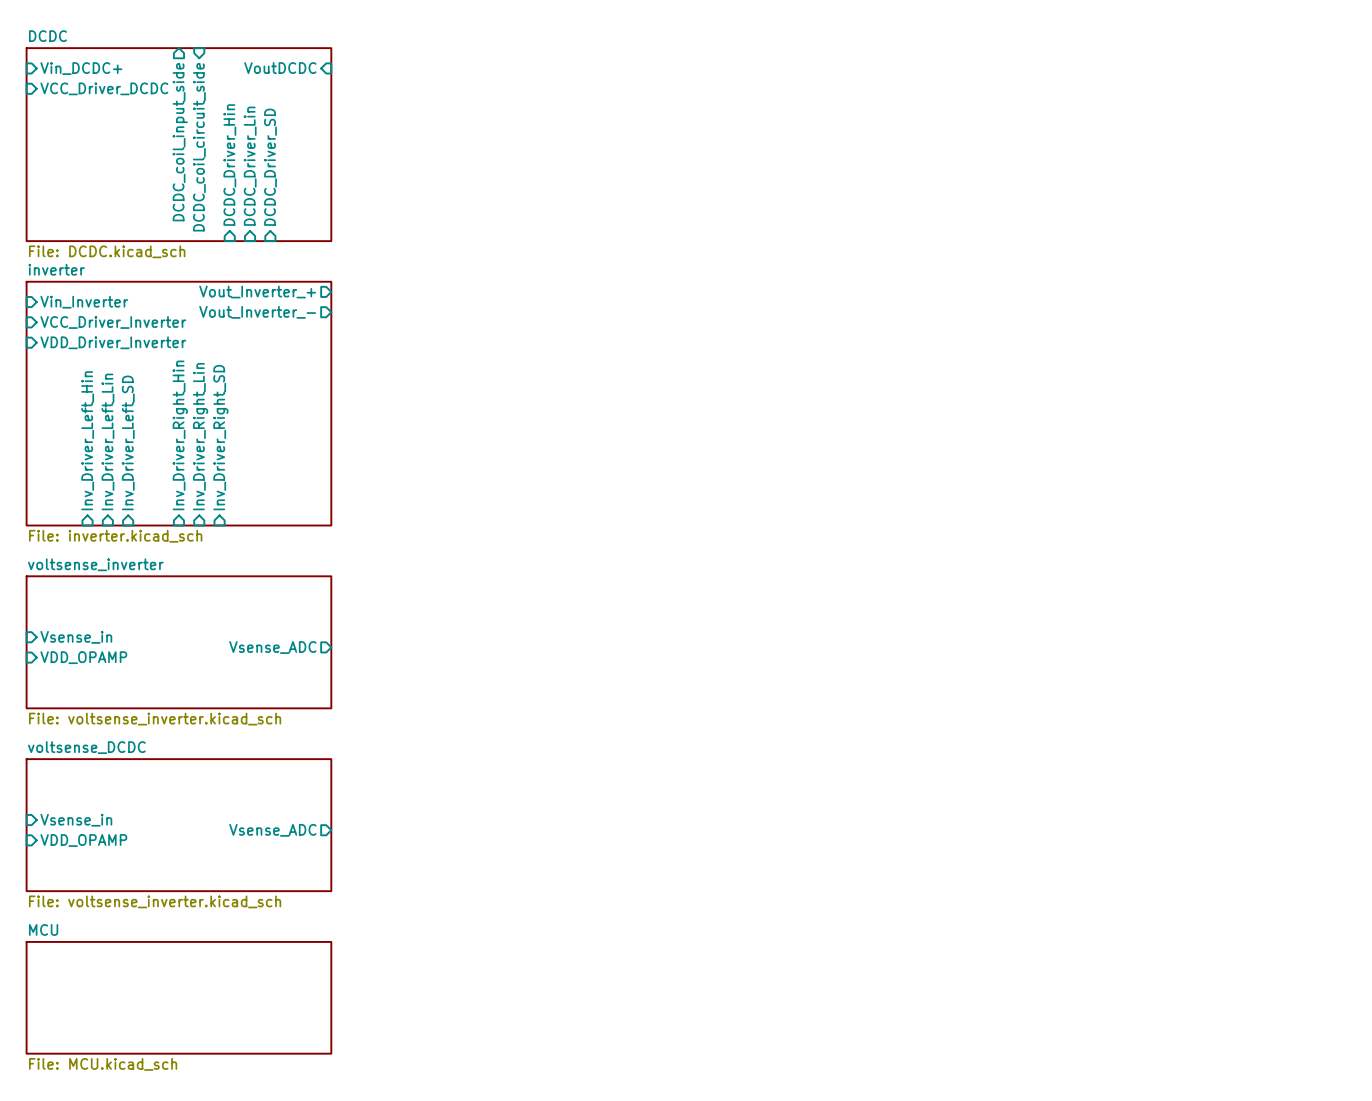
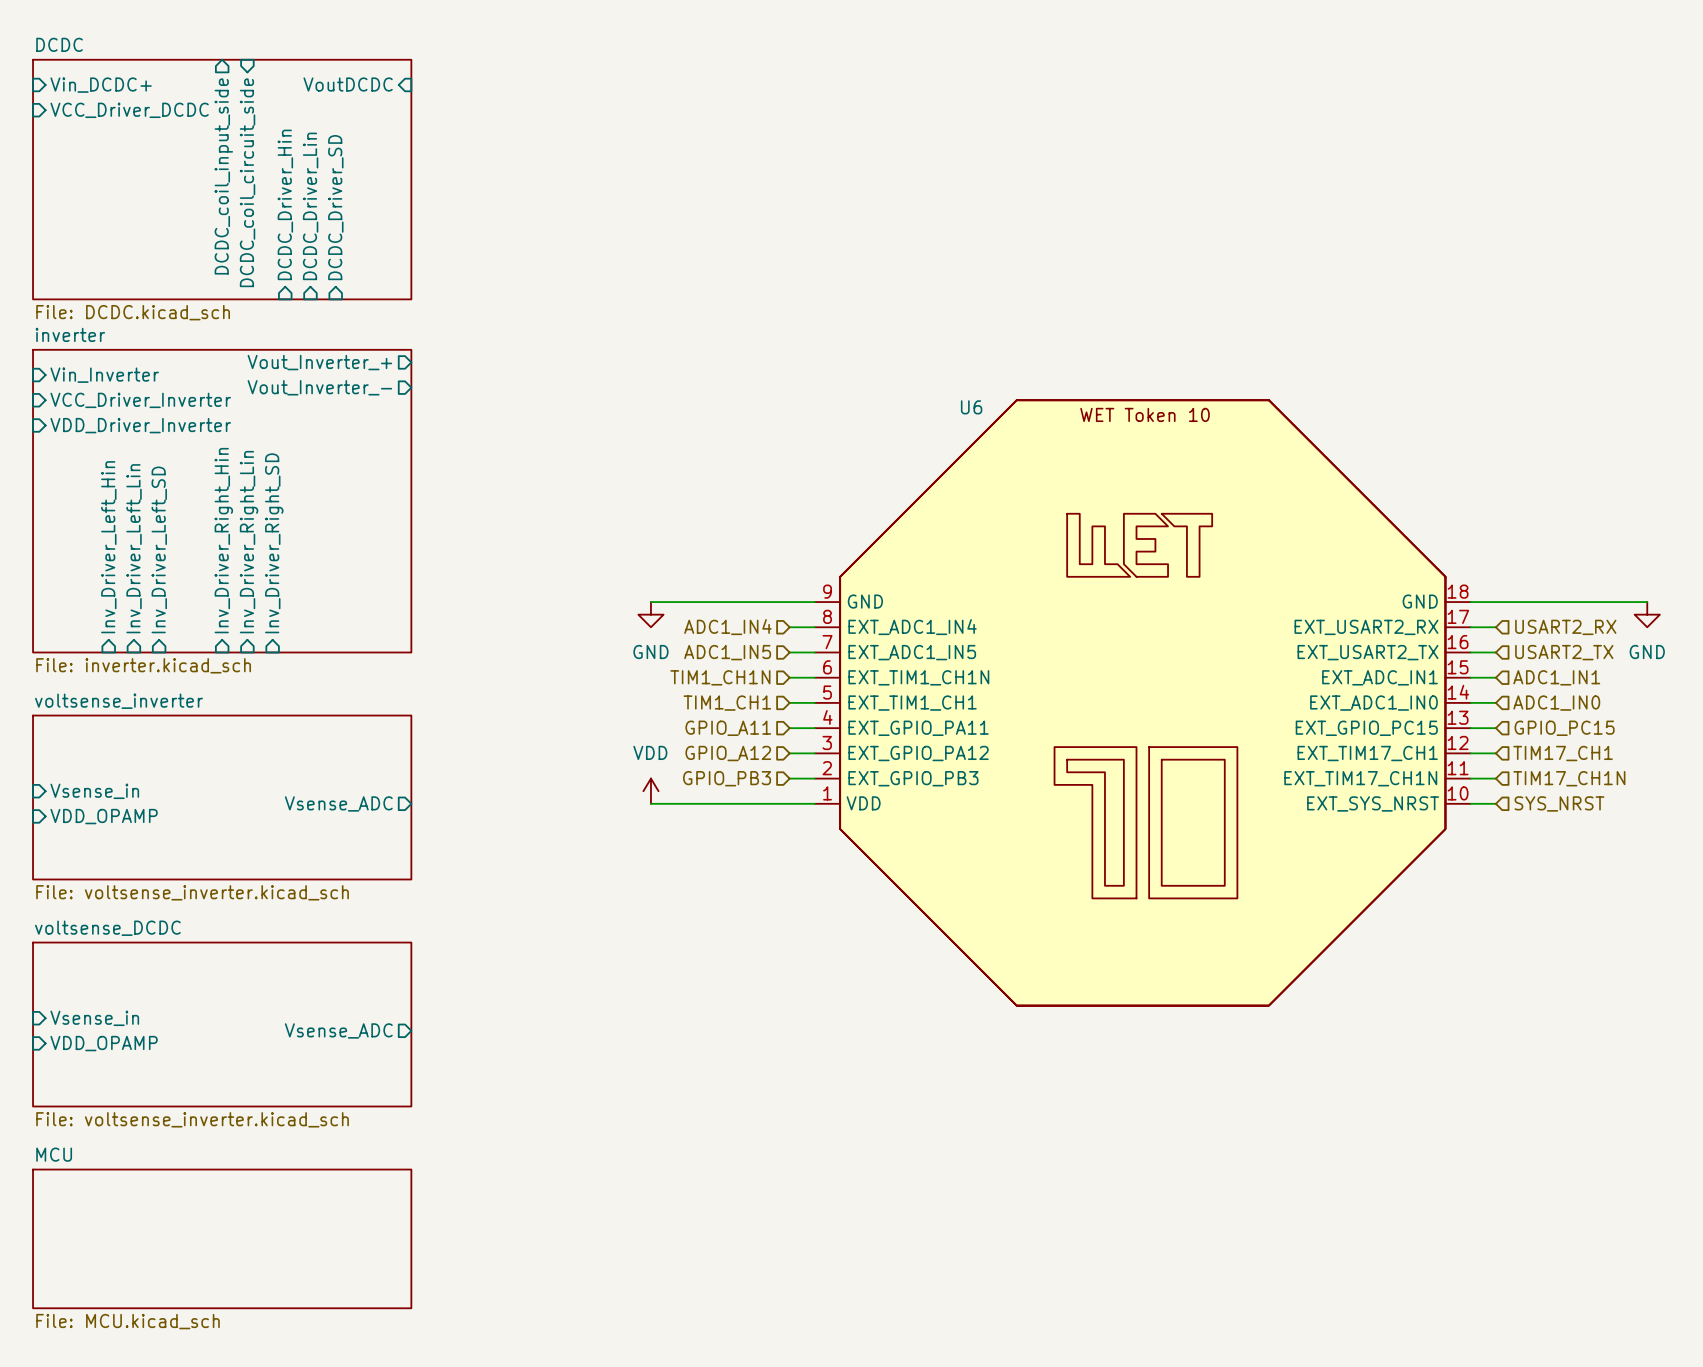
wire: none -> (650, 602) (814, 602)
wire: none -> (1470, 602) (1647, 602)
power symbol: none -> GND (650, 614)
power symbol: none -> GND (1647, 614)
hierarchical label: none -> ADC1_IN4 (727, 627)
wire: none -> (789, 627) (814, 627)
wire: none -> (1470, 627) (1495, 627)
hierarchical label: none -> USART2_RX (1565, 627)
hierarchical label: none -> ADC1_IN5 (727, 652)
wire: none -> (789, 652) (814, 652)
wire: none -> (1470, 652) (1495, 652)
hierarchical label: none -> USART2_TX (1564, 652)
hierarchical label: none -> TIM1_CH1N (720, 677)
wire: none -> (789, 677) (814, 677)
wire: none -> (1470, 677) (1495, 677)
hierarchical label: none -> ADC1_IN1 (1556, 677)
hierarchical label: none -> TIM1_CH1 (727, 703)
wire: none -> (789, 702) (814, 702)
U6: none -> (1142, 702)
wire: none -> (1470, 702) (1495, 702)
hierarchical label: none -> ADC1_IN0 (1556, 703)
hierarchical label: none -> GPIO_A11 (728, 728)
wire: none -> (789, 728) (814, 728)
wire: none -> (1470, 728) (1495, 728)
hierarchical label: none -> GPIO_PC15 (1564, 728)
hierarchical label: none -> GPIO_A12 (728, 753)
wire: none -> (789, 753) (814, 753)
wire: none -> (1470, 753) (1495, 753)
hierarchical label: none -> TIM17_CH1 (1563, 753)
hierarchical label: none -> GPIO_PB3 (727, 778)
wire: none -> (789, 778) (814, 778)
wire: none -> (1470, 778) (1495, 778)
hierarchical label: none -> TIM17_CH1N (1569, 778)
power symbol: none -> VDD (650, 791)
wire: none -> (650, 803) (814, 803)
wire: none -> (1470, 803) (1495, 803)
hierarchical label: none -> SYS_NRST (1559, 803)

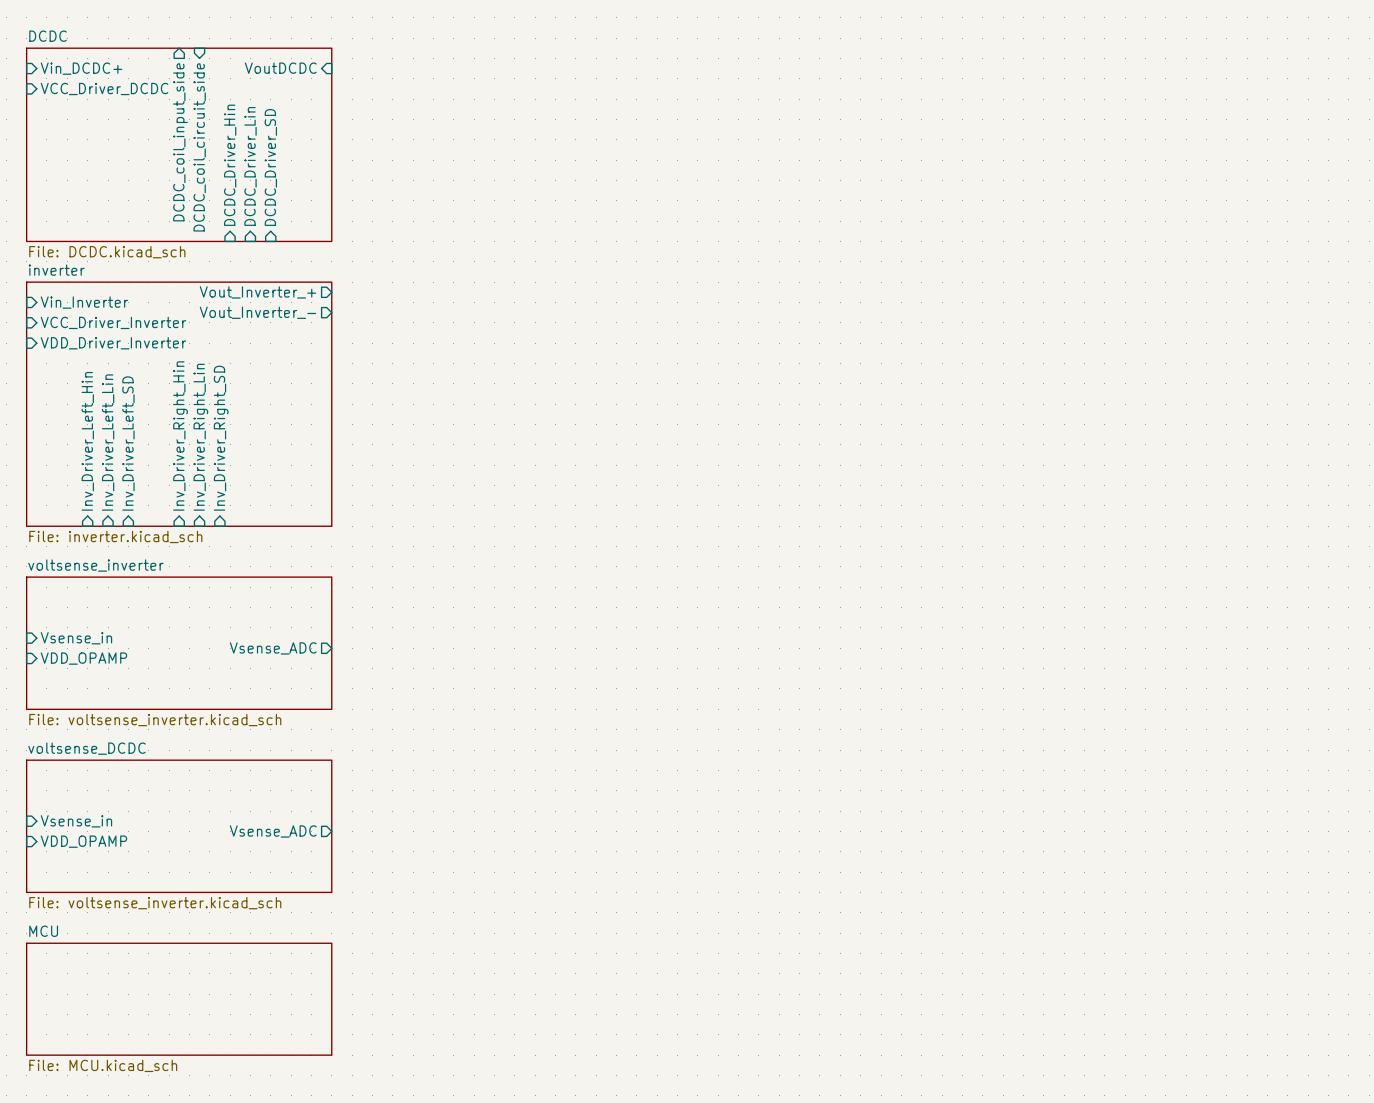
wire: (650, 602) (814, 602) -> none
wire: (1470, 602) (1647, 602) -> none
power symbol: GND (650, 614) -> none
power symbol: GND (1647, 614) -> none
hierarchical label: ADC1_IN4 (727, 627) -> none
wire: (789, 627) (814, 627) -> none
wire: (1470, 627) (1495, 627) -> none
hierarchical label: USART2_RX (1565, 627) -> none
hierarchical label: ADC1_IN5 (727, 652) -> none
wire: (789, 652) (814, 652) -> none
wire: (1470, 652) (1495, 652) -> none
hierarchical label: USART2_TX (1564, 652) -> none
hierarchical label: TIM1_CH1N (720, 677) -> none
wire: (789, 677) (814, 677) -> none
wire: (1470, 677) (1495, 677) -> none
hierarchical label: ADC1_IN1 (1556, 677) -> none
wire: (789, 702) (814, 702) -> none
U6: (1142, 702) -> none
wire: (1470, 702) (1495, 702) -> none
hierarchical label: TIM1_CH1 (727, 703) -> none
hierarchical label: ADC1_IN0 (1556, 703) -> none
hierarchical label: GPIO_A11 (728, 728) -> none
wire: (789, 728) (814, 728) -> none
wire: (1470, 728) (1495, 728) -> none
hierarchical label: GPIO_PC15 (1564, 728) -> none
hierarchical label: GPIO_A12 (728, 753) -> none
wire: (789, 753) (814, 753) -> none
wire: (1470, 753) (1495, 753) -> none
hierarchical label: TIM17_CH1 (1563, 753) -> none
hierarchical label: GPIO_PB3 (727, 778) -> none
wire: (789, 778) (814, 778) -> none
wire: (1470, 778) (1495, 778) -> none
hierarchical label: TIM17_CH1N (1569, 778) -> none
power symbol: VDD (650, 791) -> none
wire: (650, 803) (814, 803) -> none
wire: (1470, 803) (1495, 803) -> none
hierarchical label: SYS_NRST (1559, 803) -> none

